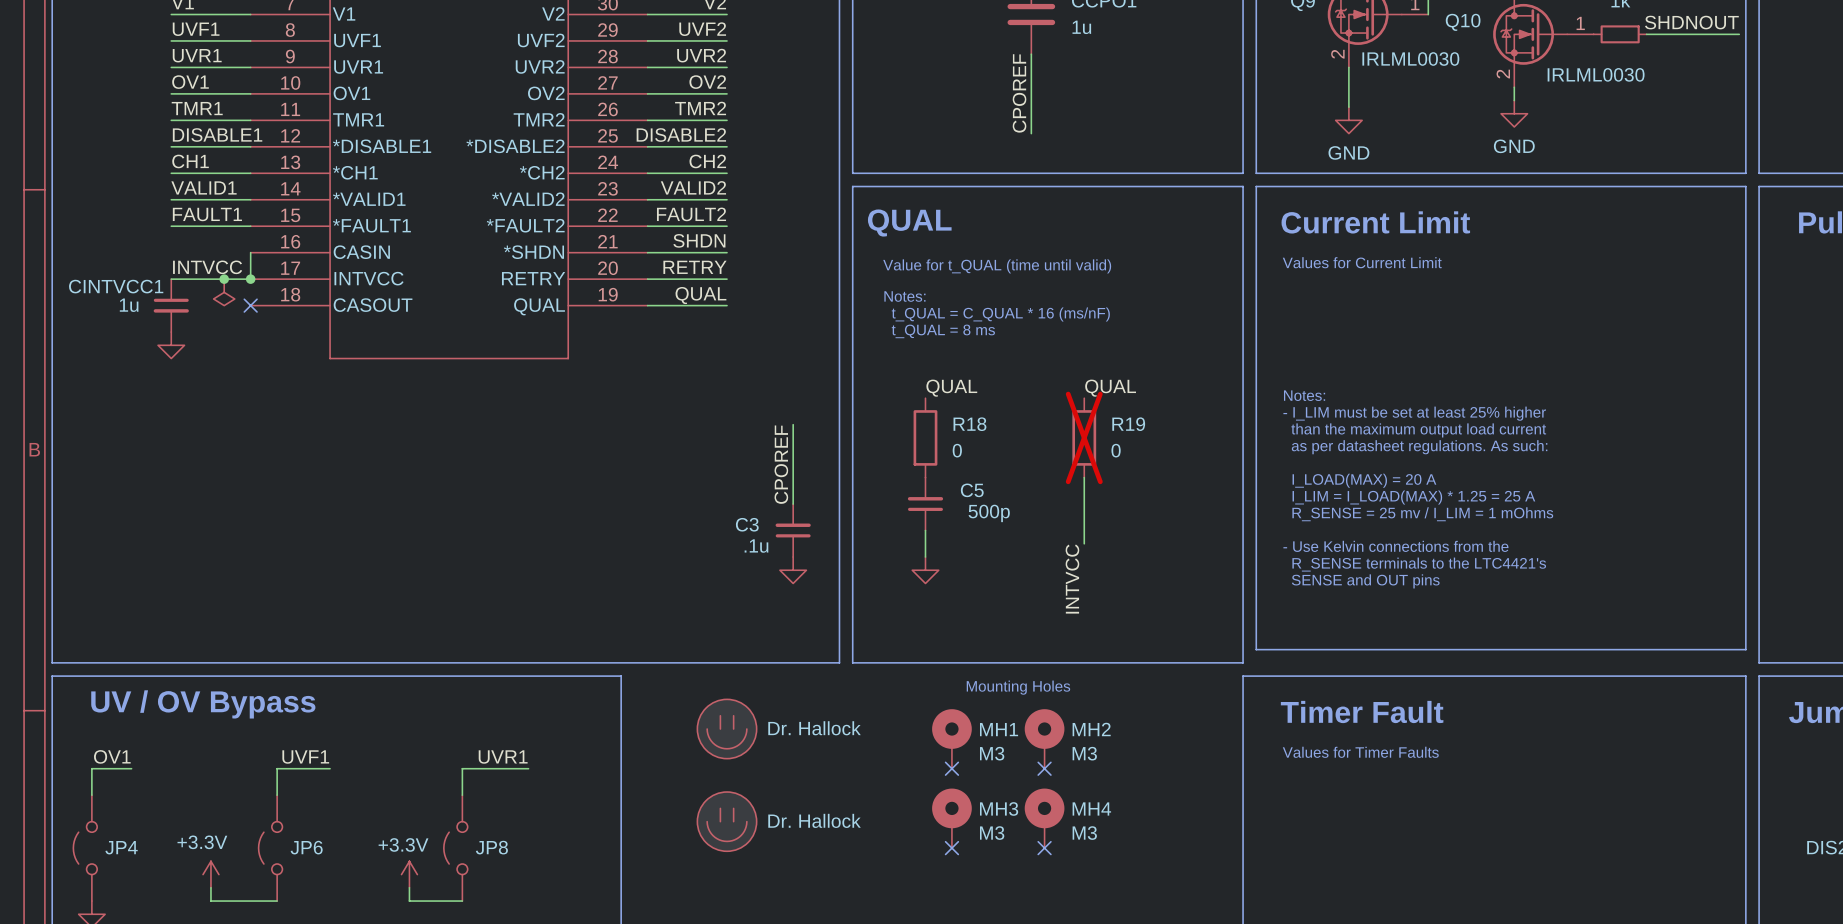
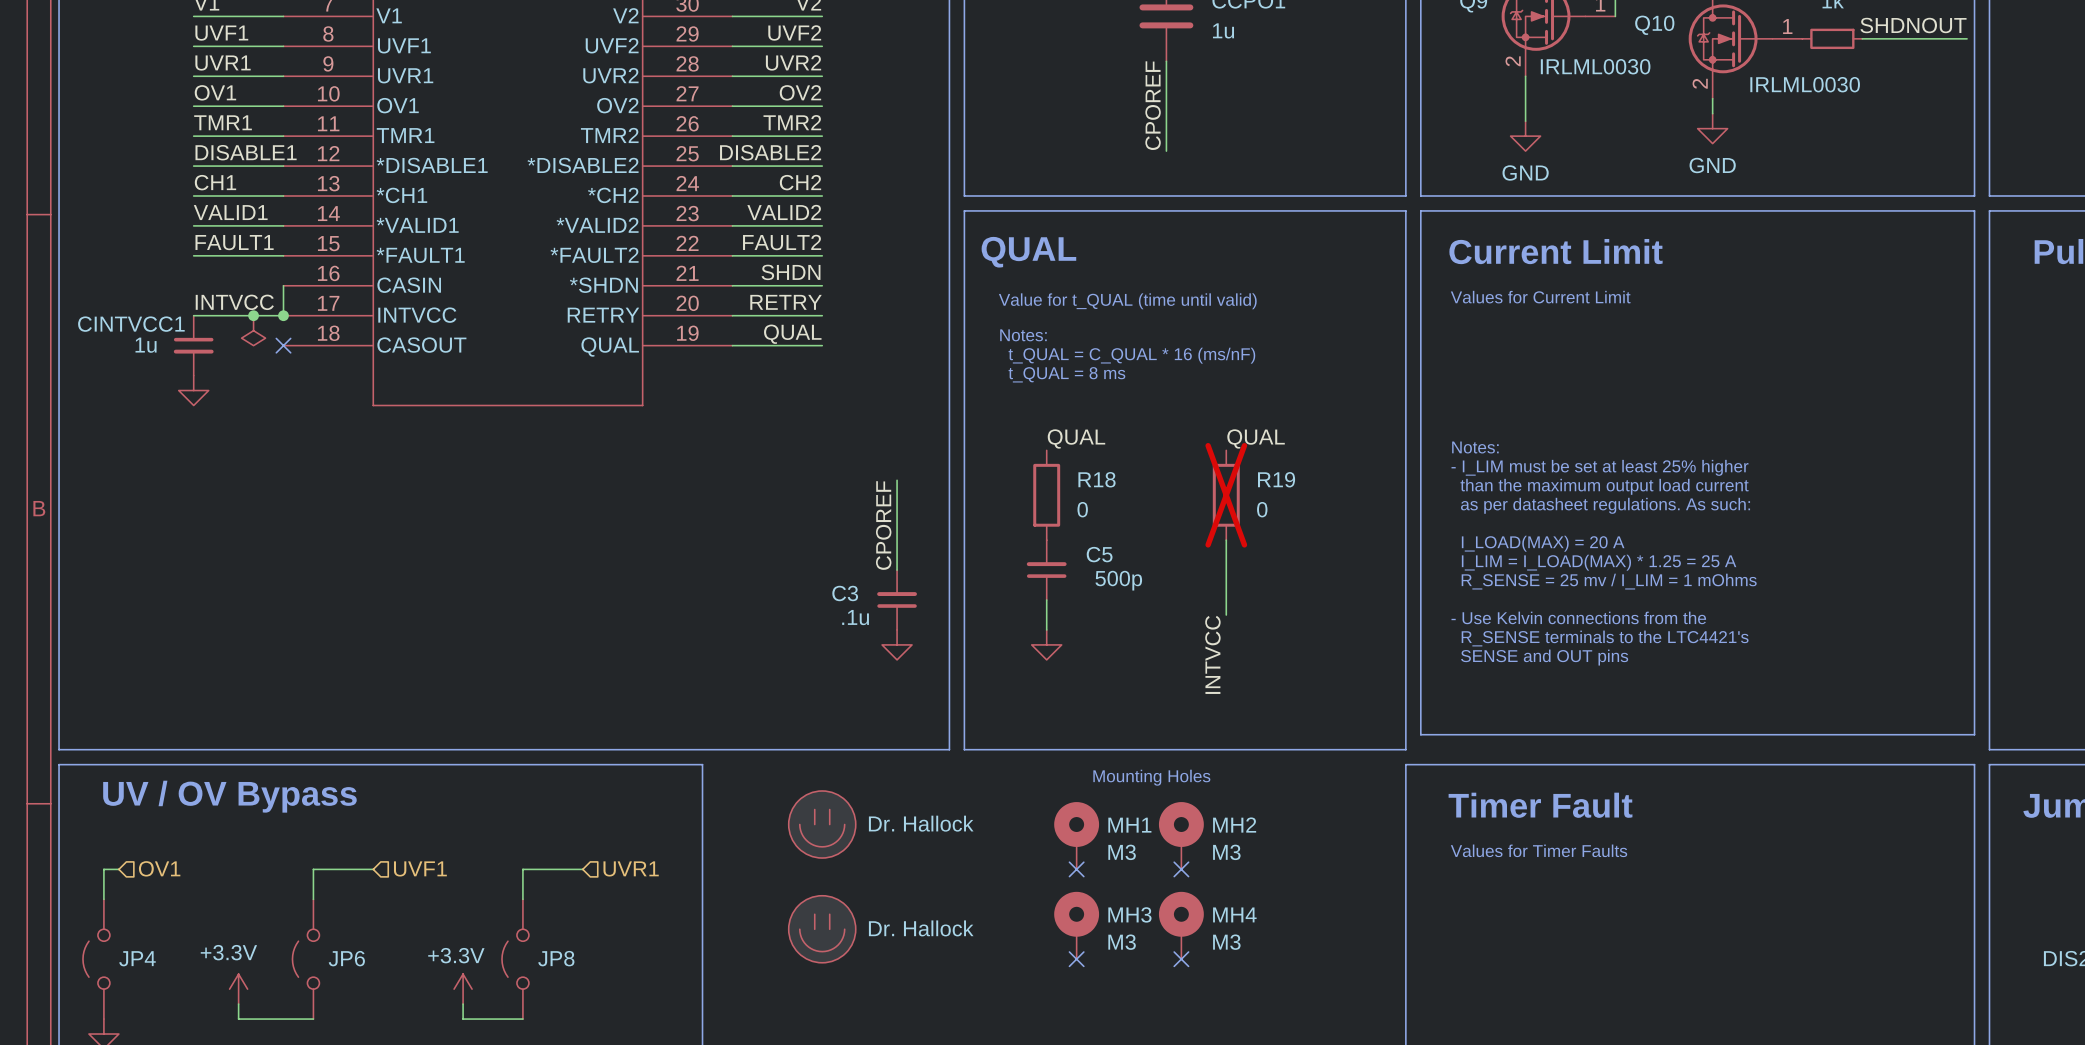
label: OV1 (112, 756) -> none
label: UVF1 (305, 757) -> none
label: UVR1 (503, 757) -> none
wire: (105, 768) (131, 768) -> none
hierarchical label: none -> OV1 (159, 868)
hierarchical label: none -> UVF1 (420, 868)
wire: (515, 768) (528, 768) -> none
hierarchical label: none -> UVR1 (631, 868)

